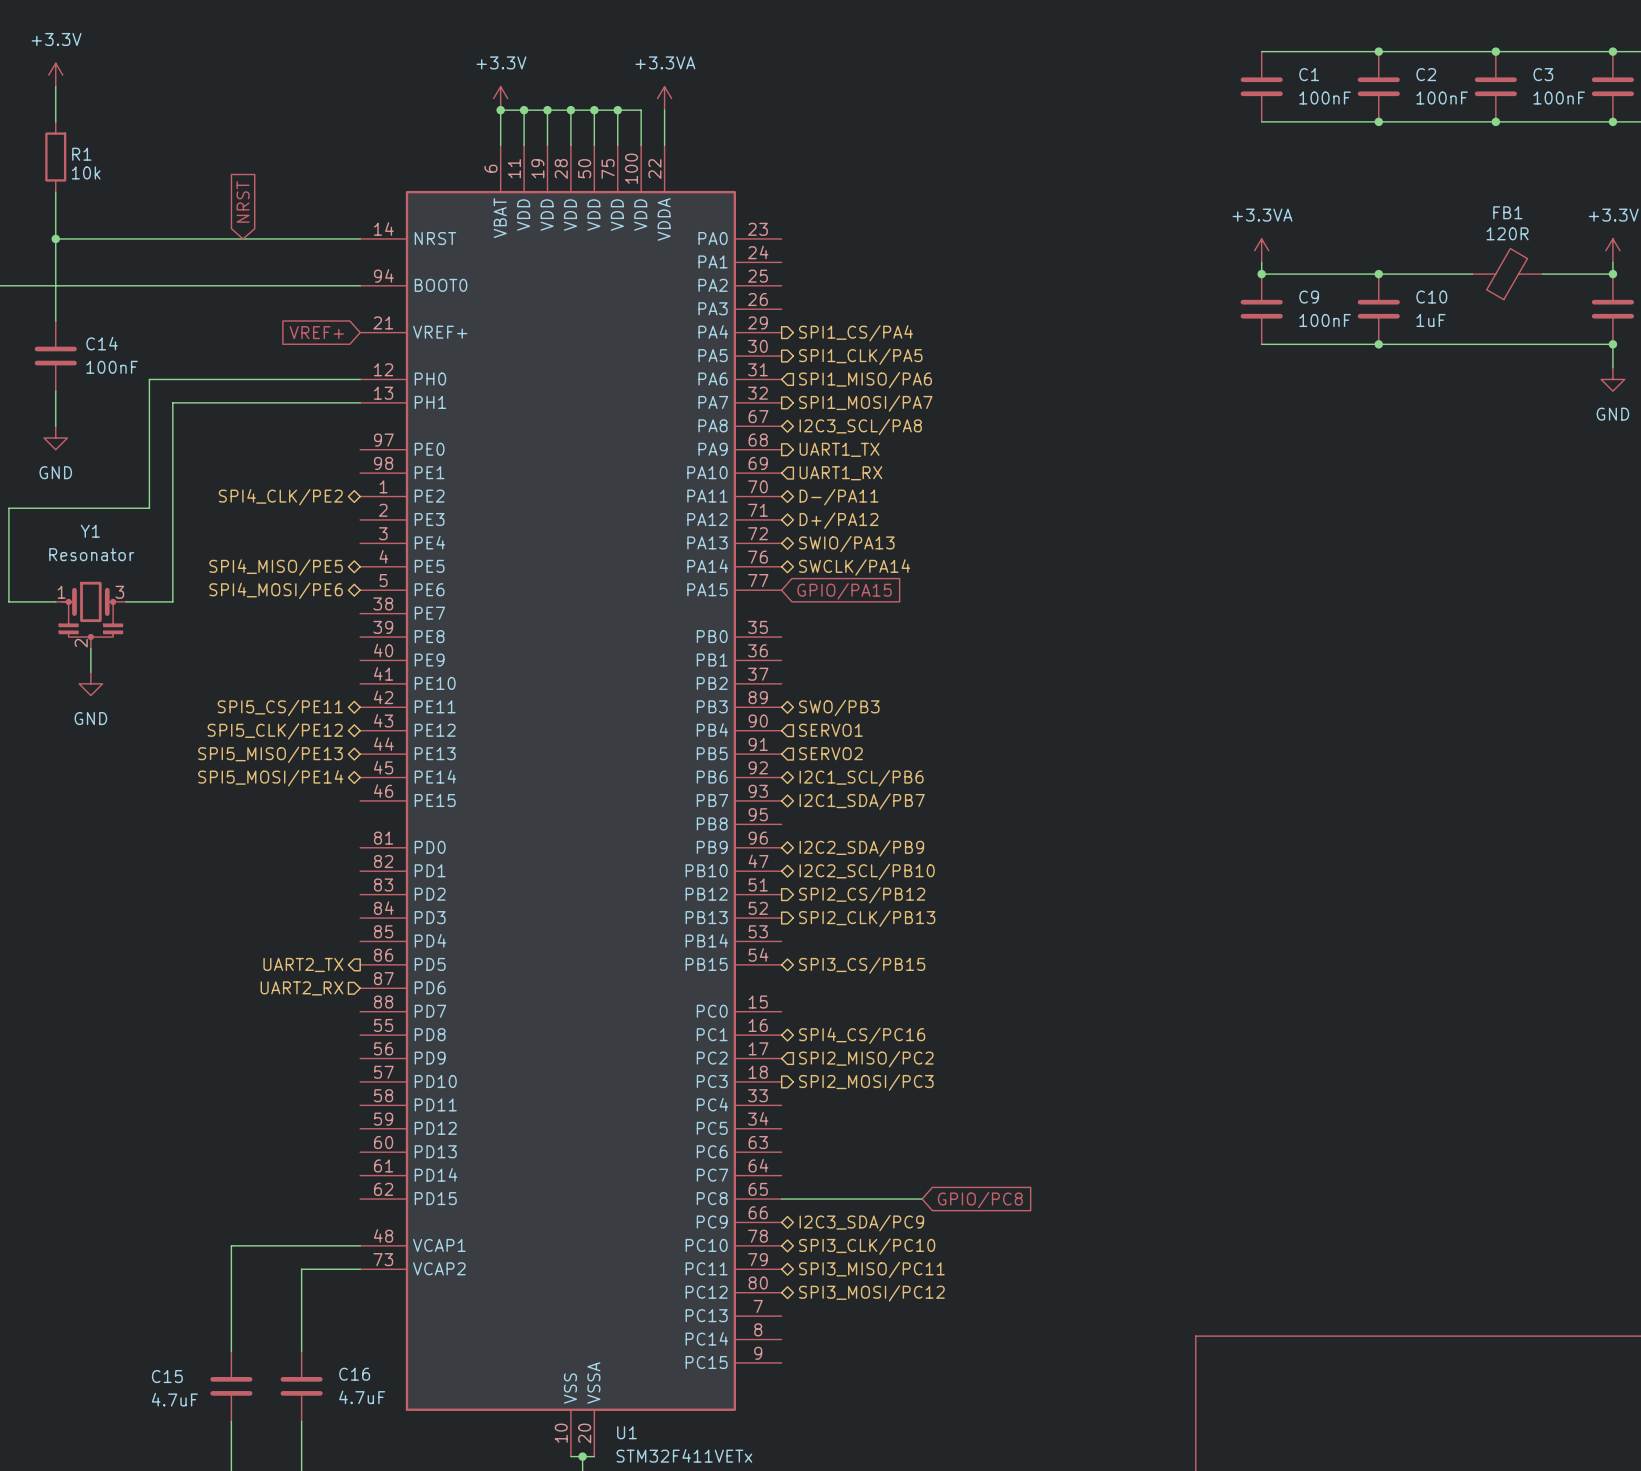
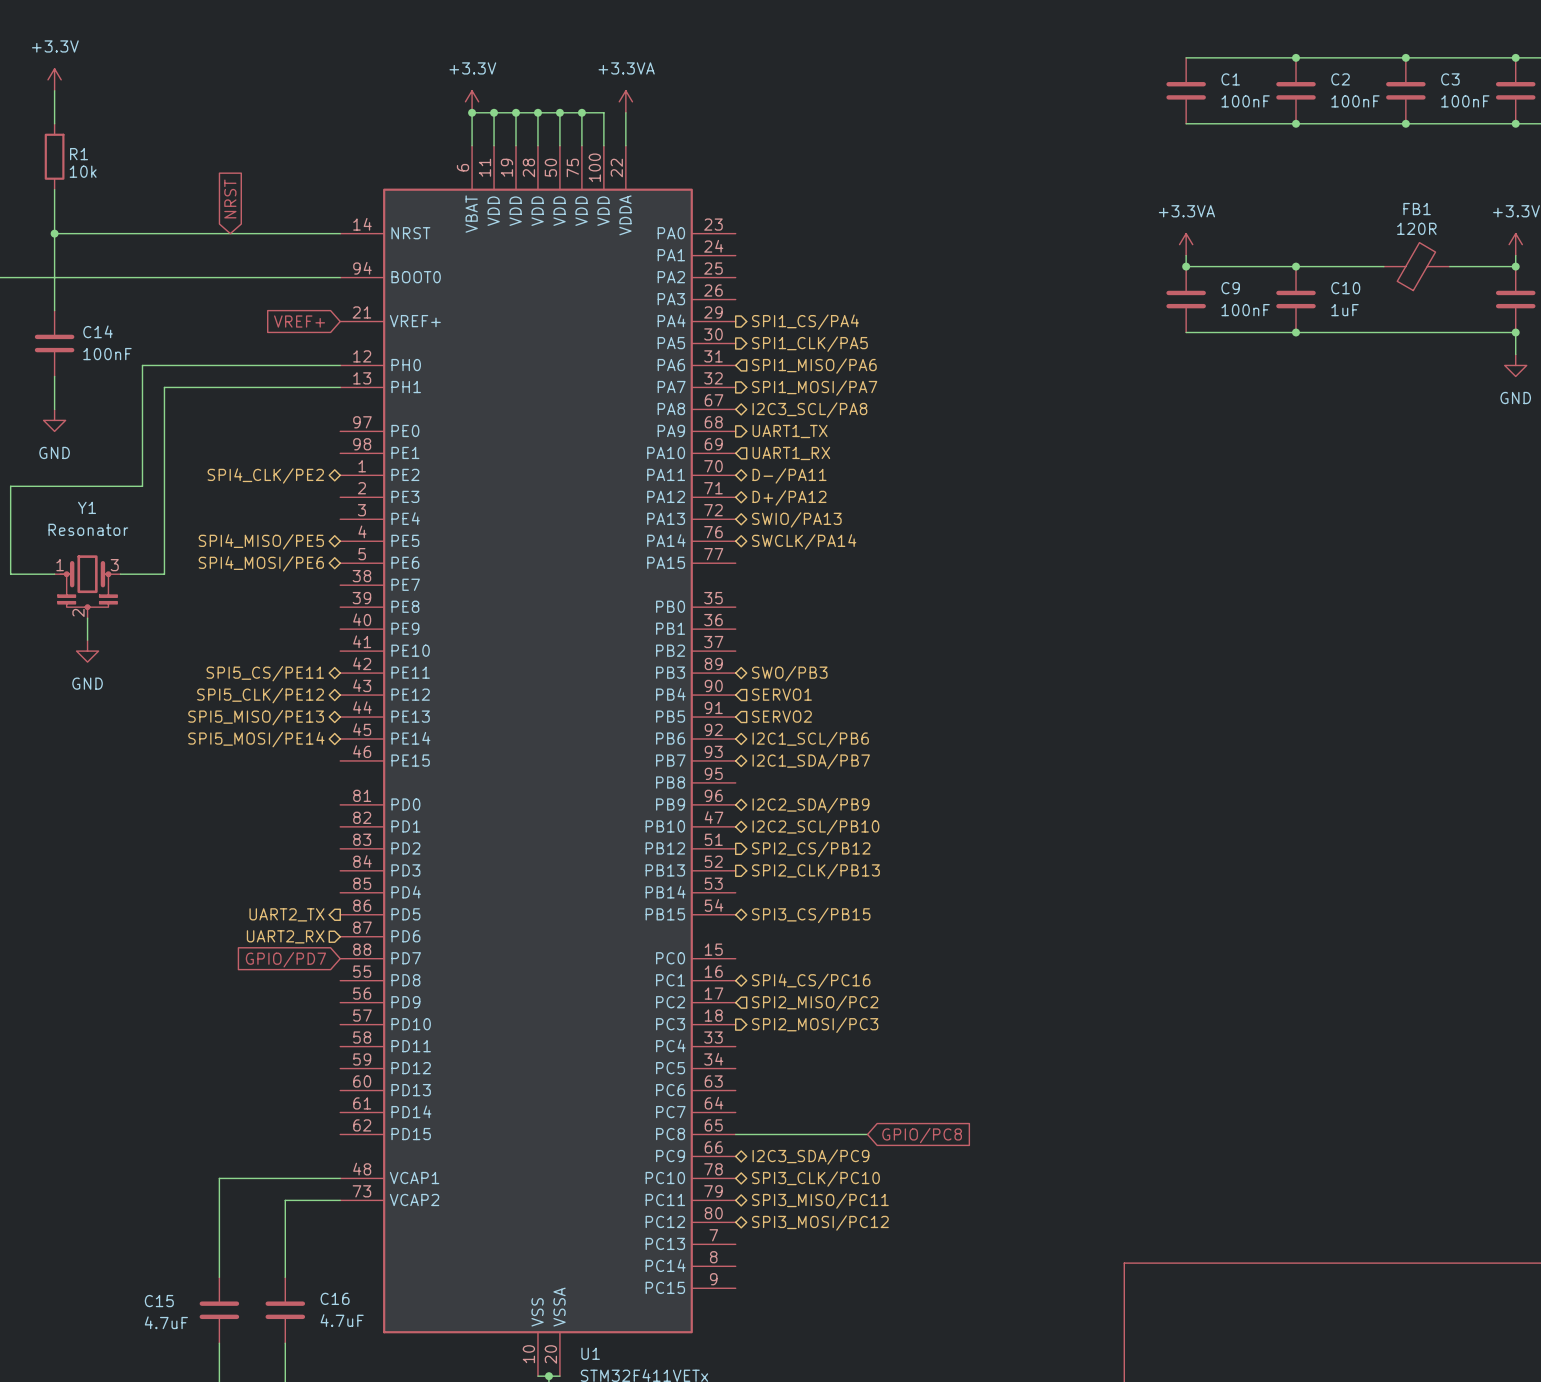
global label: GPIO/PA15 (844, 591) -> none
global label: none -> GPIO/PD7 (285, 959)

